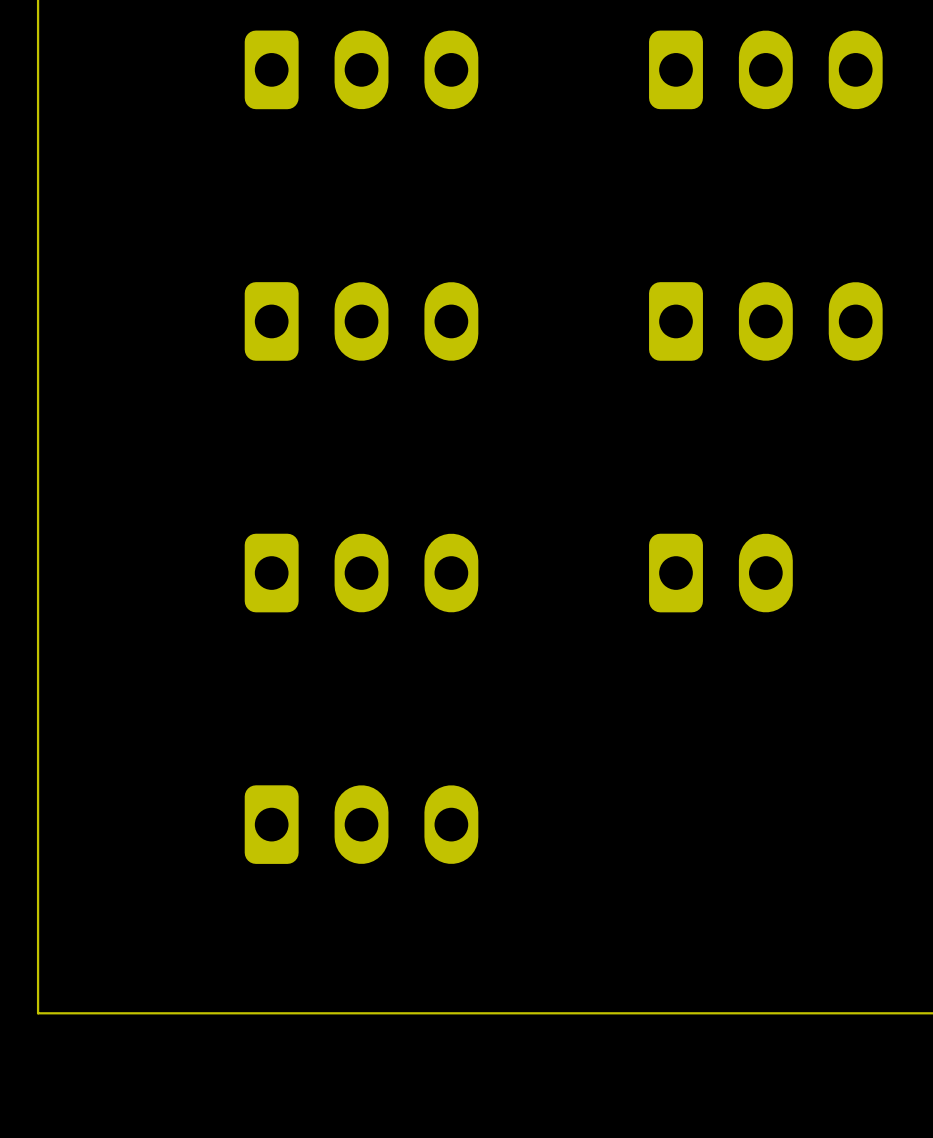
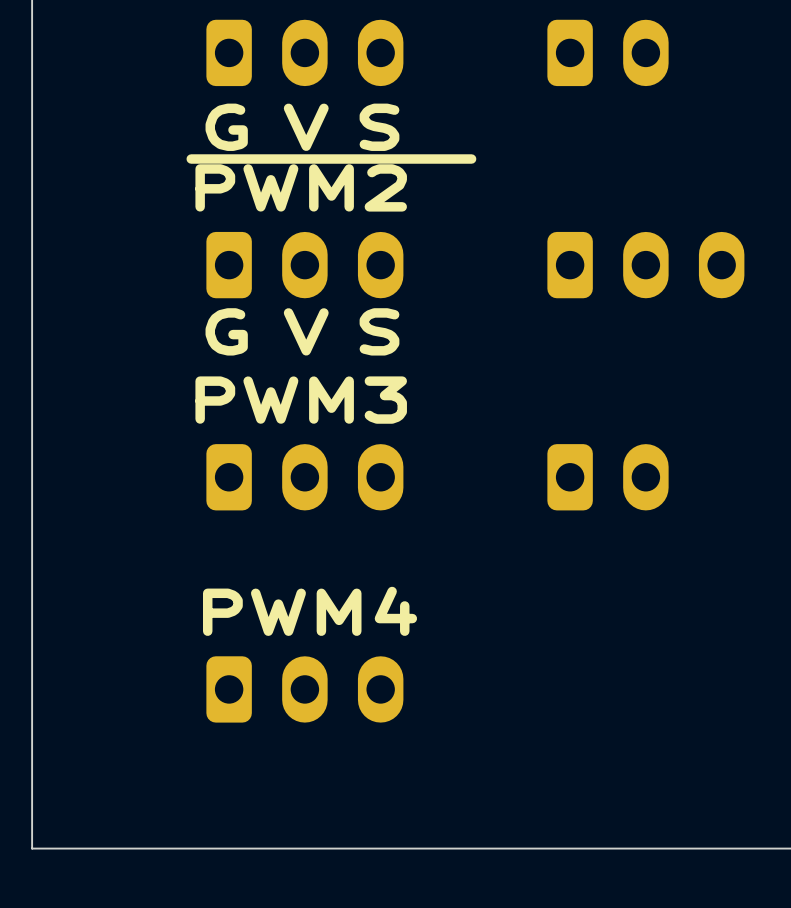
part footprint: [649, 30, 883, 110] -> [547, 19, 669, 87]
text: none -> G (226, 127)
text: none -> V (306, 127)
text: none -> S (379, 127)
line: none -> (471, 159) (191, 159)
text: none -> PWM2 (301, 187)
text: none -> G (226, 331)
text: none -> V (306, 331)
text: none -> S (379, 331)
text: none -> PWM3 (301, 400)
text: none -> PWM4 (310, 611)

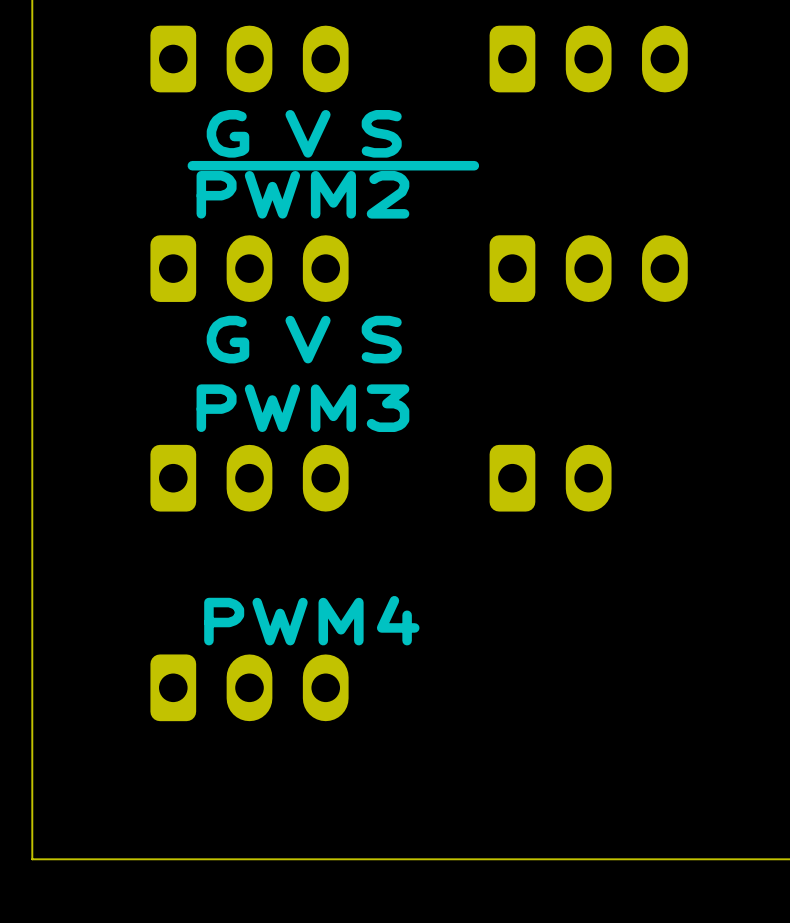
part footprint: [547, 19, 669, 87] -> [489, 25, 688, 93]
part position: (304, 52) -> (249, 59)
part position: (304, 265) -> (249, 268)
part position: (645, 265) -> (588, 268)
part position: (304, 477) -> (249, 478)
part position: (608, 477) -> (550, 478)
part position: (304, 689) -> (249, 687)

